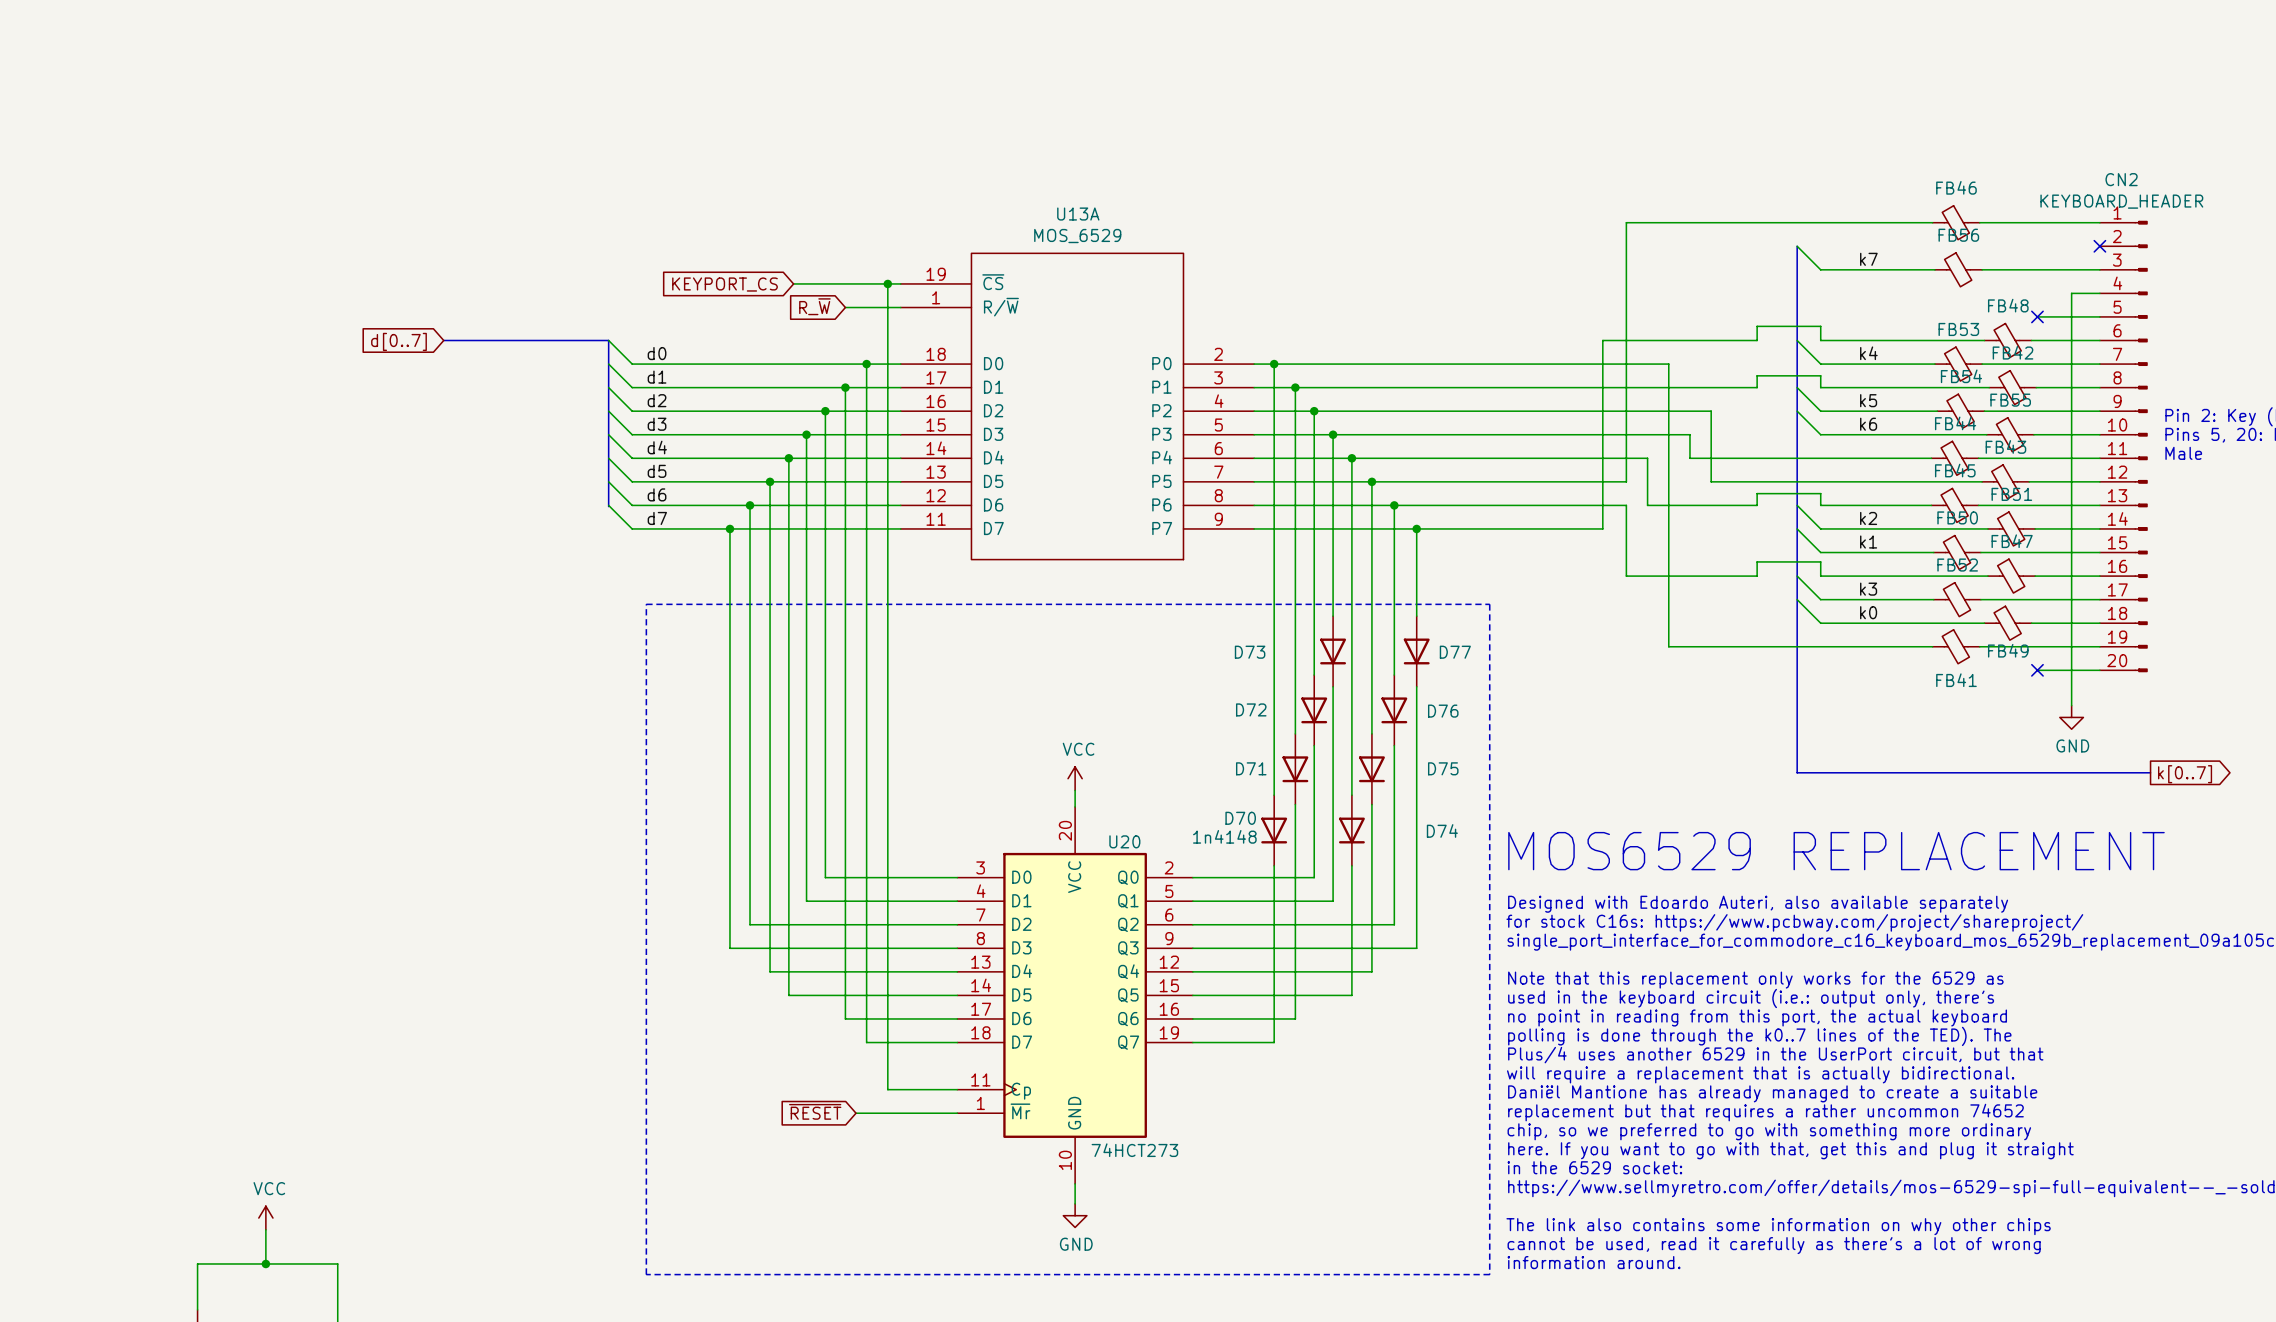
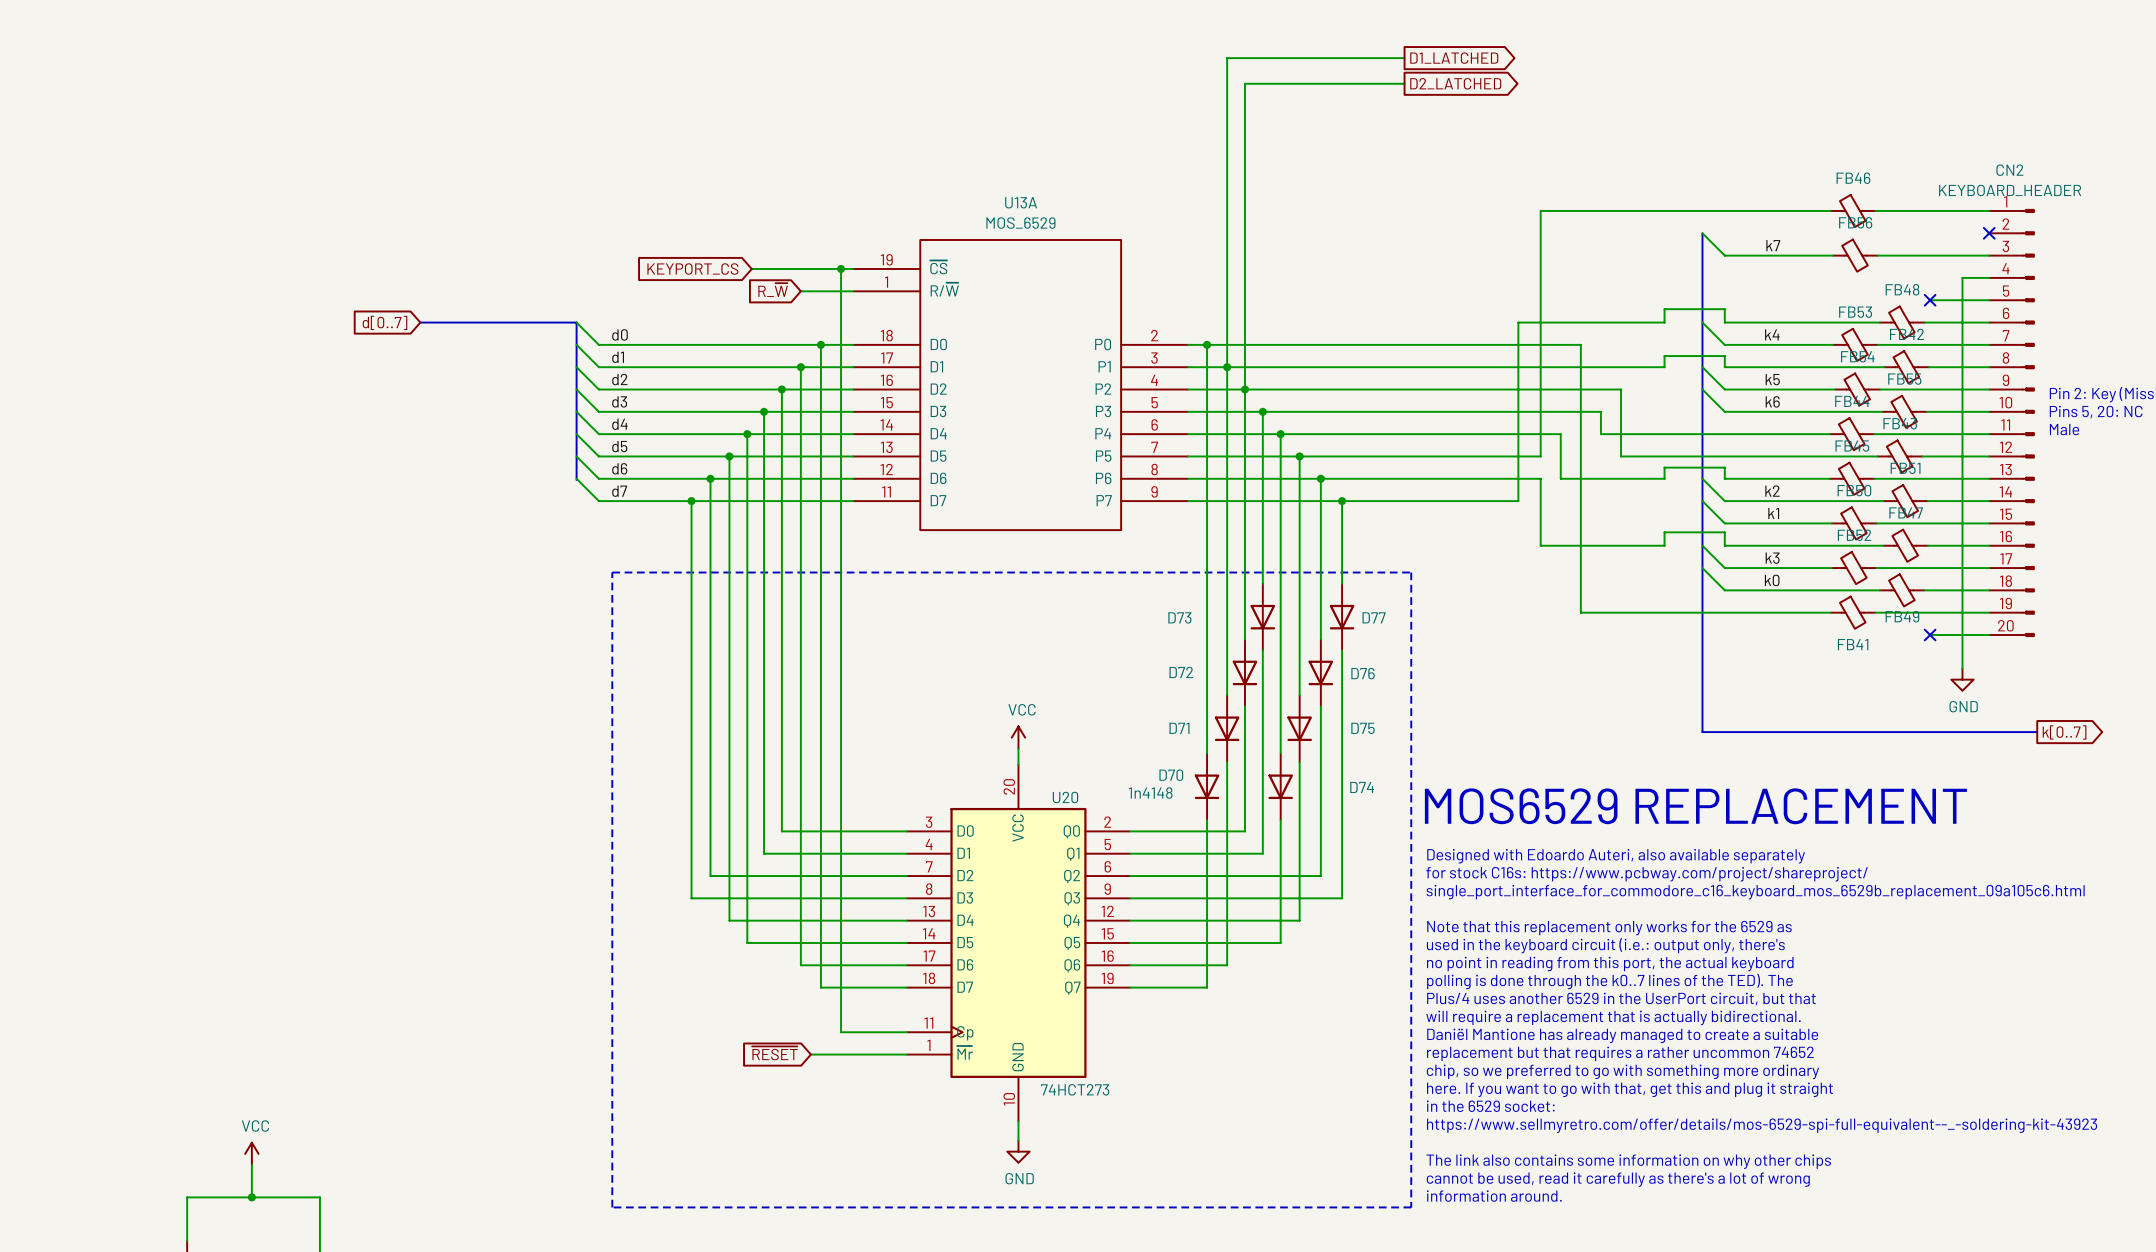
wire: none -> (1404, 58) (1227, 58) (1227, 367)
global label: none -> D1_LATCHED (1454, 58)
wire: none -> (1404, 83) (1244, 83) (1244, 389)
global label: none -> D2_LATCHED (1455, 83)

